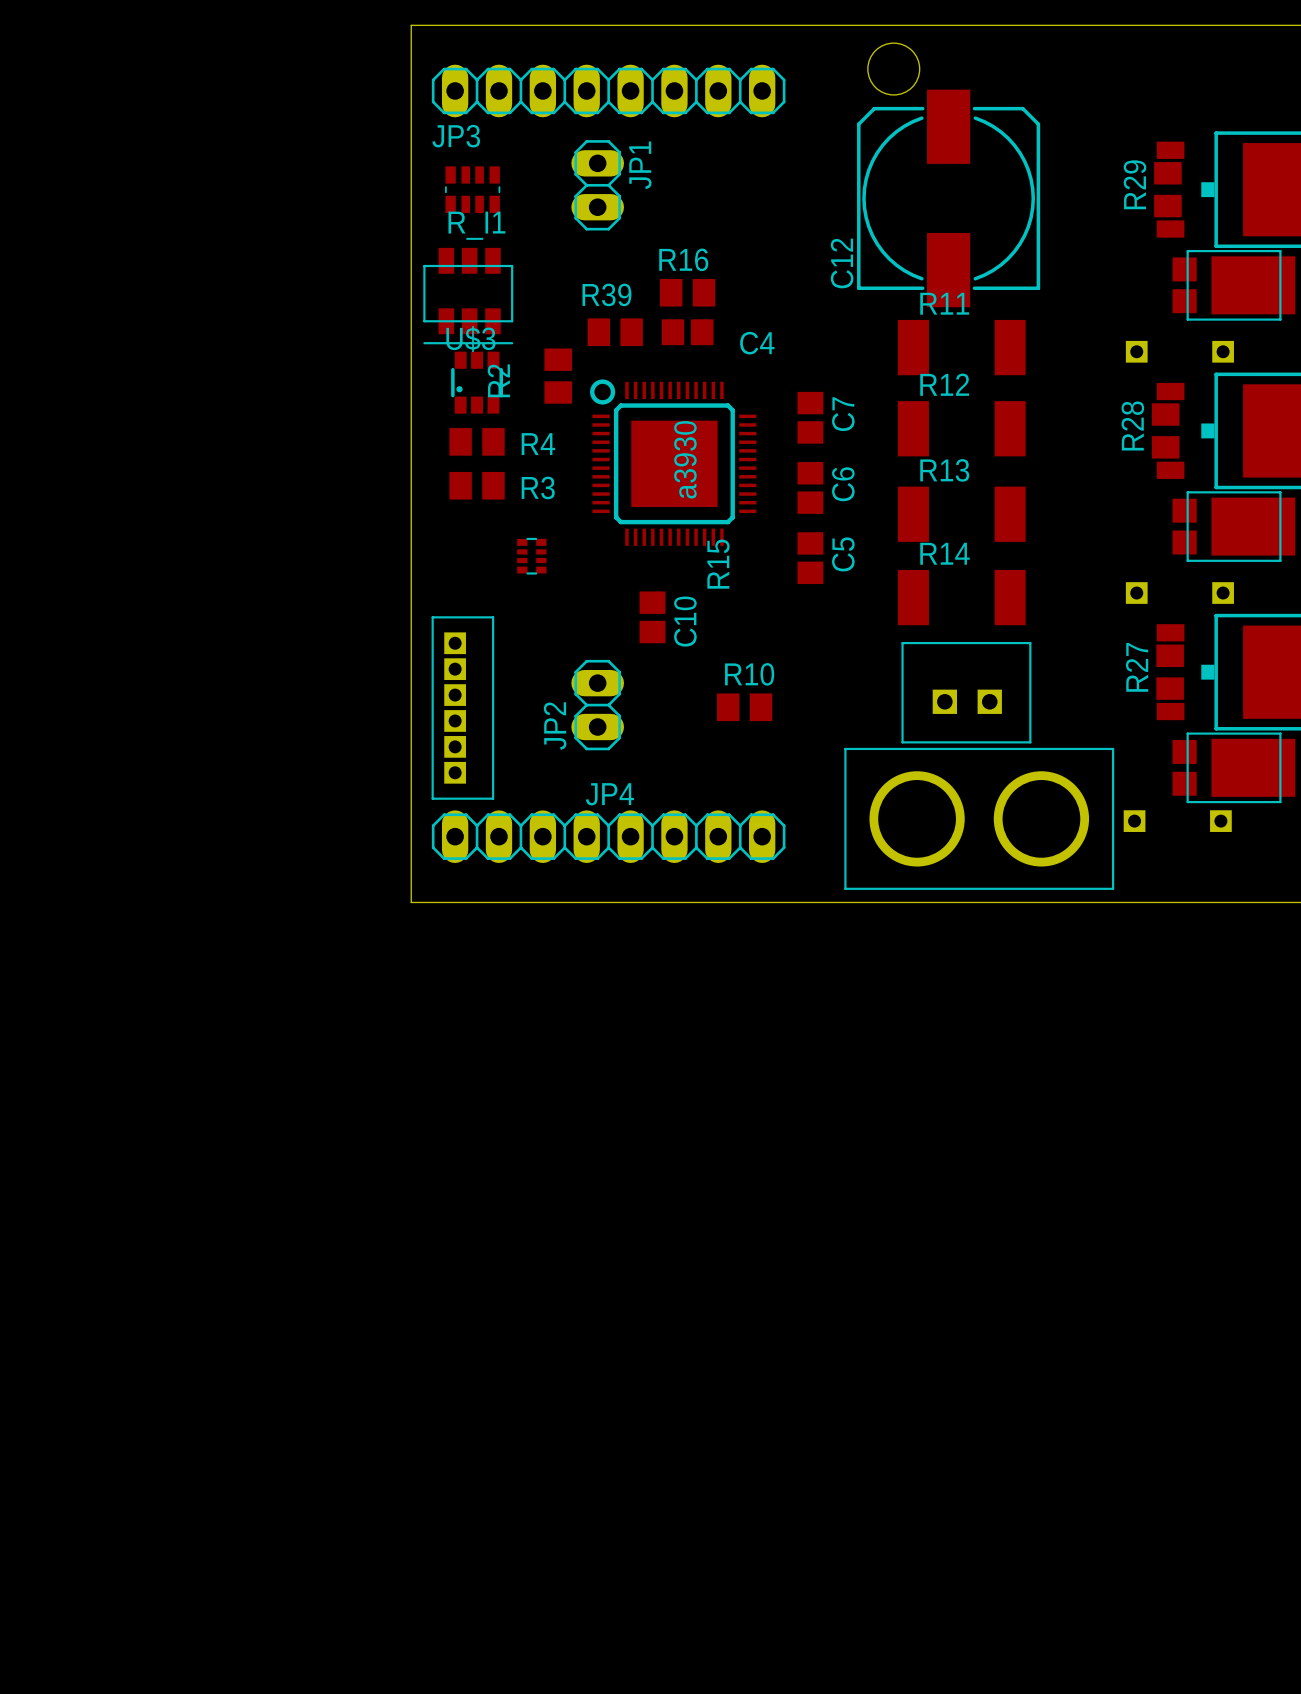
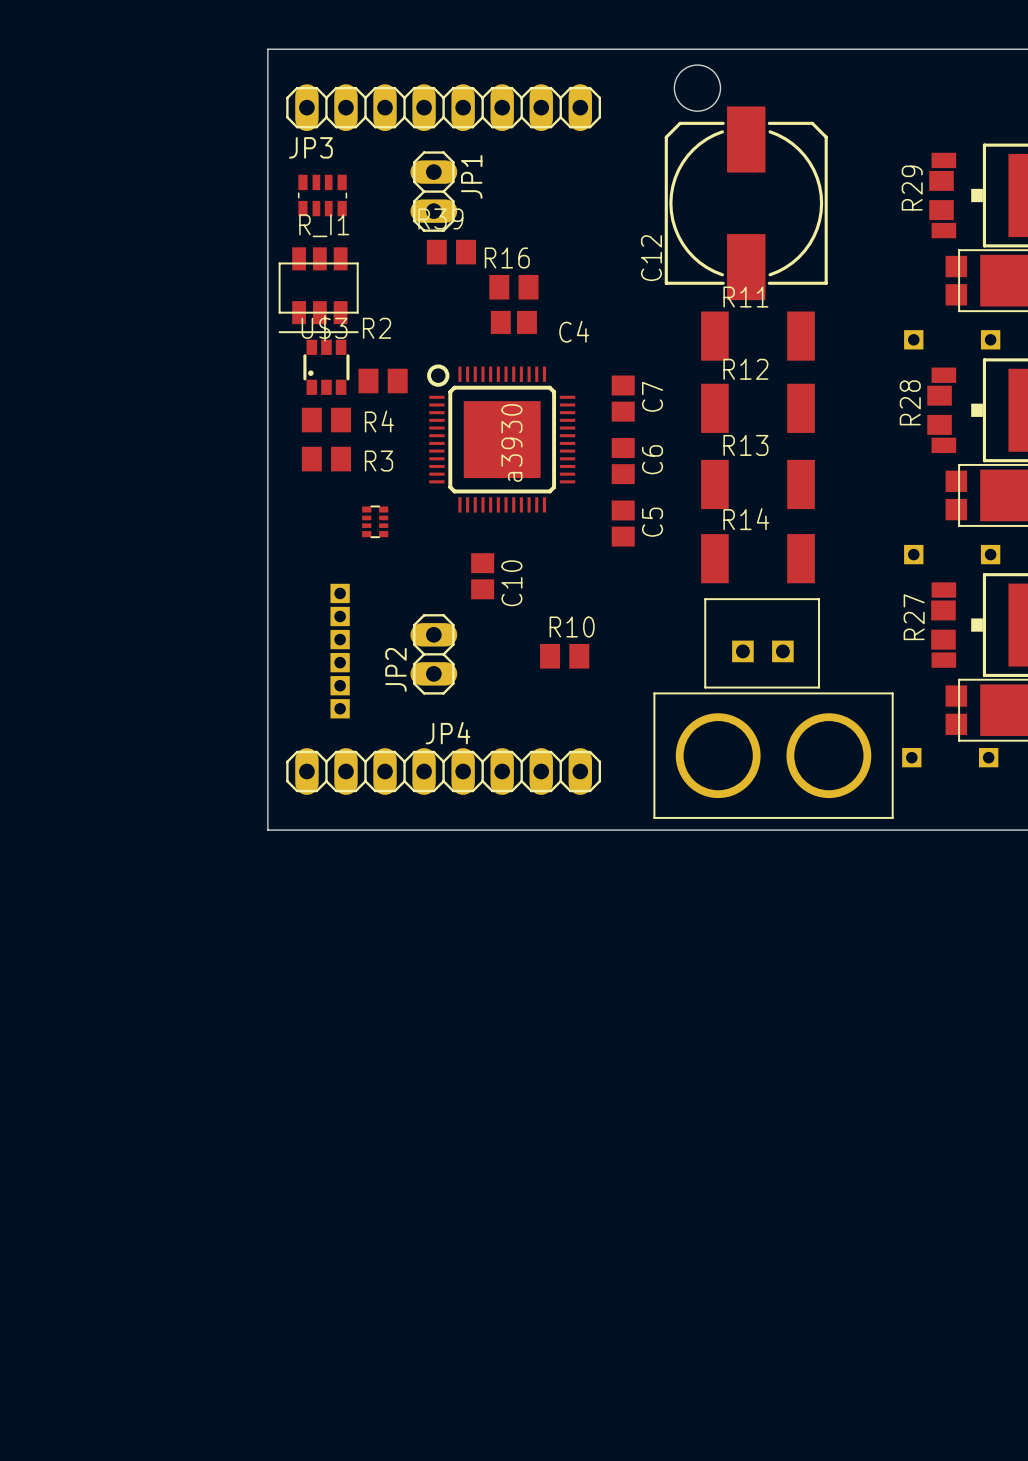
R39 position: (615, 332) -> (451, 252)
R2 rotation: 0° (558, 376) -> 90° clockwise (383, 380)
R15: (718, 564) -> none
part side: top (462, 708) -> bottom (340, 651)

